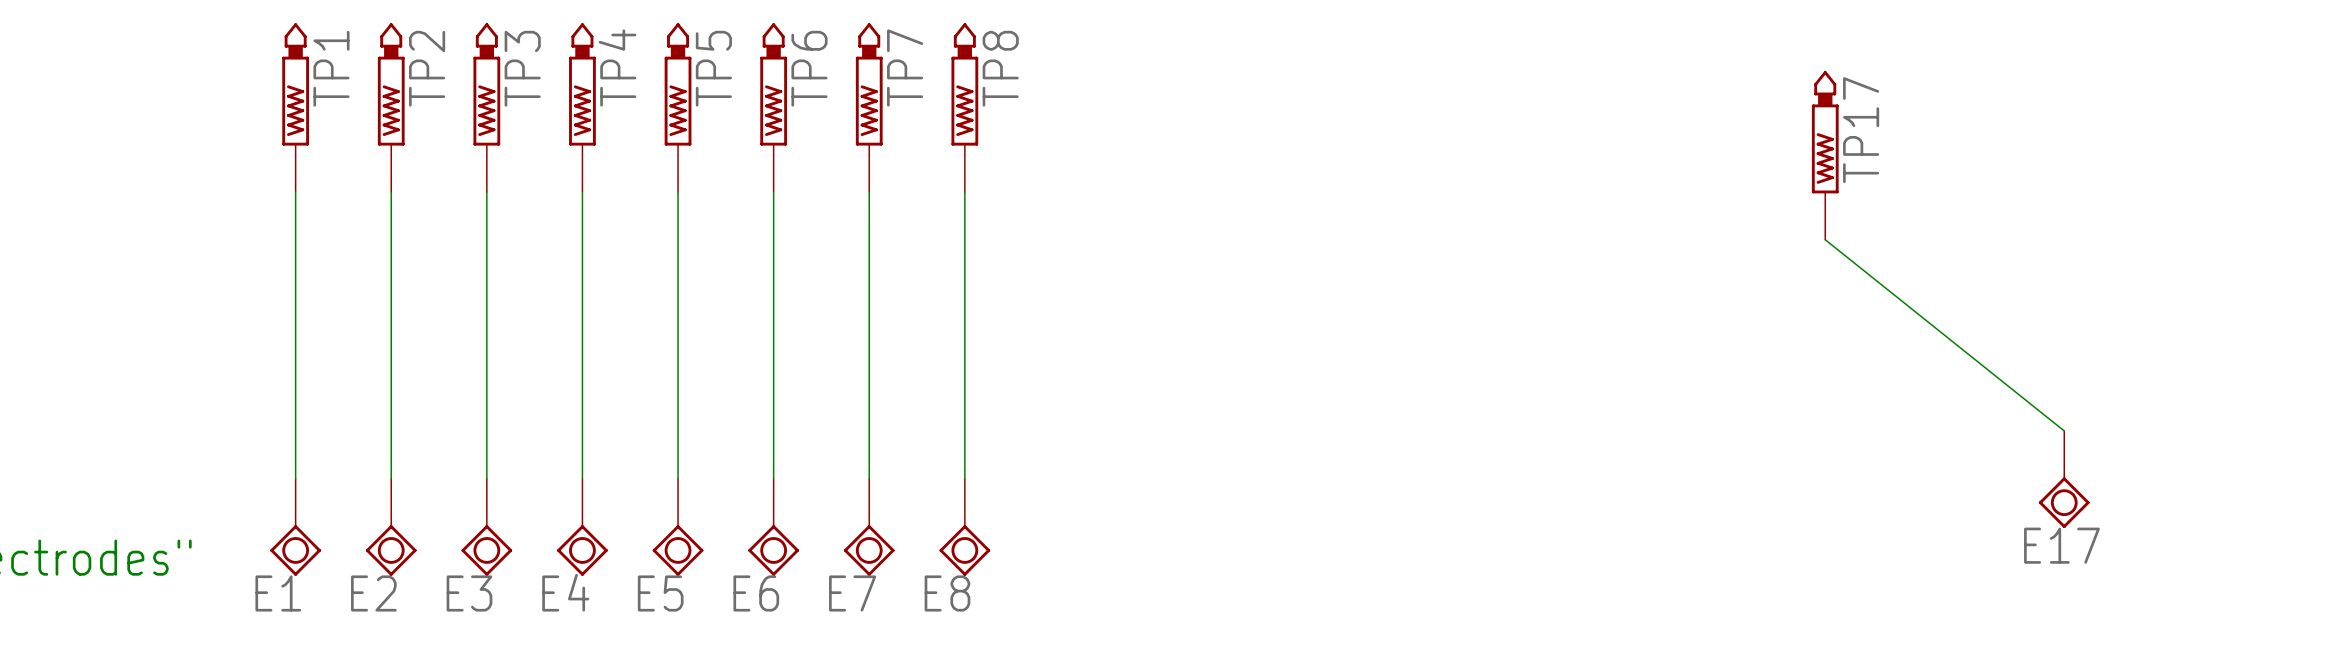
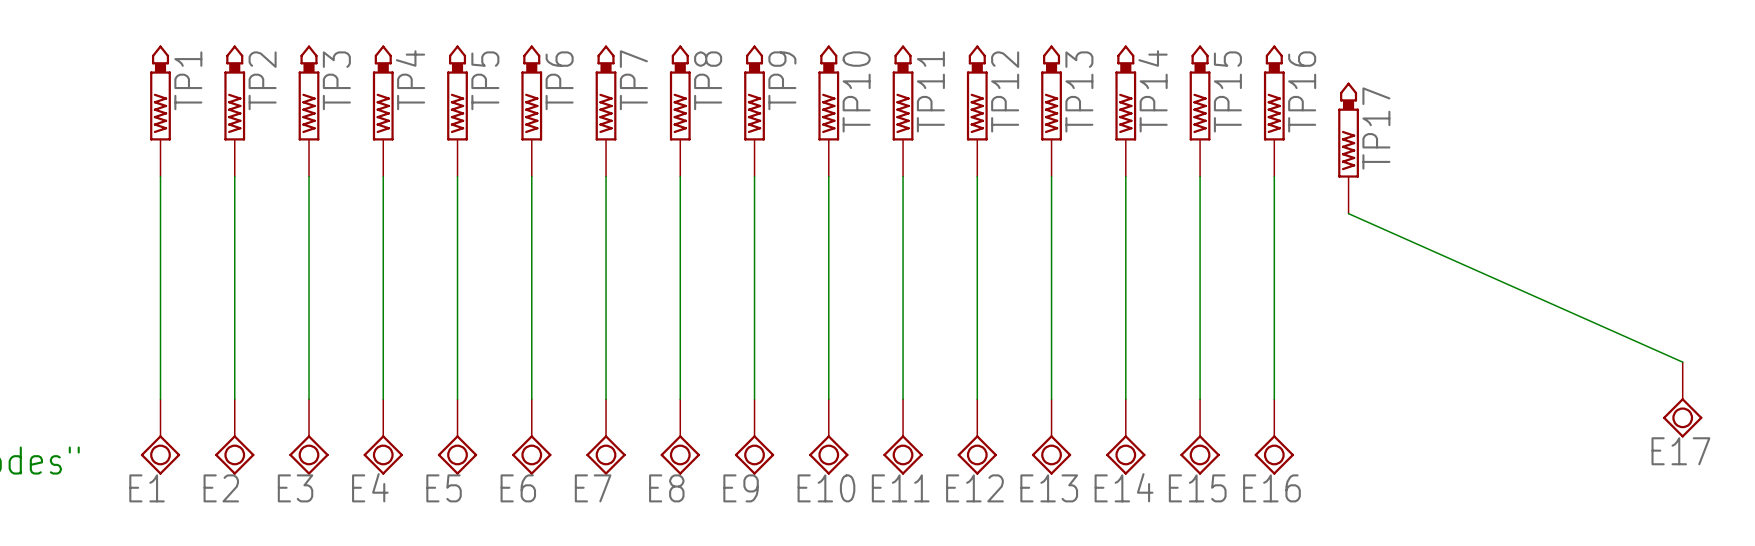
TP9: none -> (754, 110)
TP10: none -> (828, 110)
TP11: none -> (903, 110)
TP12: none -> (977, 110)
TP13: none -> (1051, 110)
TP14: none -> (1125, 110)
TP15: none -> (1200, 110)
TP16: none -> (1274, 110)
wire: none -> (754, 176) (754, 399)
wire: none -> (828, 176) (828, 399)
wire: none -> (903, 176) (903, 399)
wire: none -> (977, 176) (977, 399)
wire: none -> (1051, 176) (1051, 399)
wire: none -> (1125, 176) (1125, 399)
wire: none -> (1200, 176) (1200, 399)
wire: none -> (1274, 176) (1274, 399)
wire: (1825, 239) (2064, 430) -> (1348, 213) (1682, 362)
E17 position: (2064, 479) -> (1682, 399)
E9: none -> (754, 436)
E10: none -> (828, 436)
E11: none -> (903, 436)
E12: none -> (977, 436)
E13: none -> (1051, 436)
E14: none -> (1125, 436)
E15: none -> (1200, 436)
E16: none -> (1274, 436)

